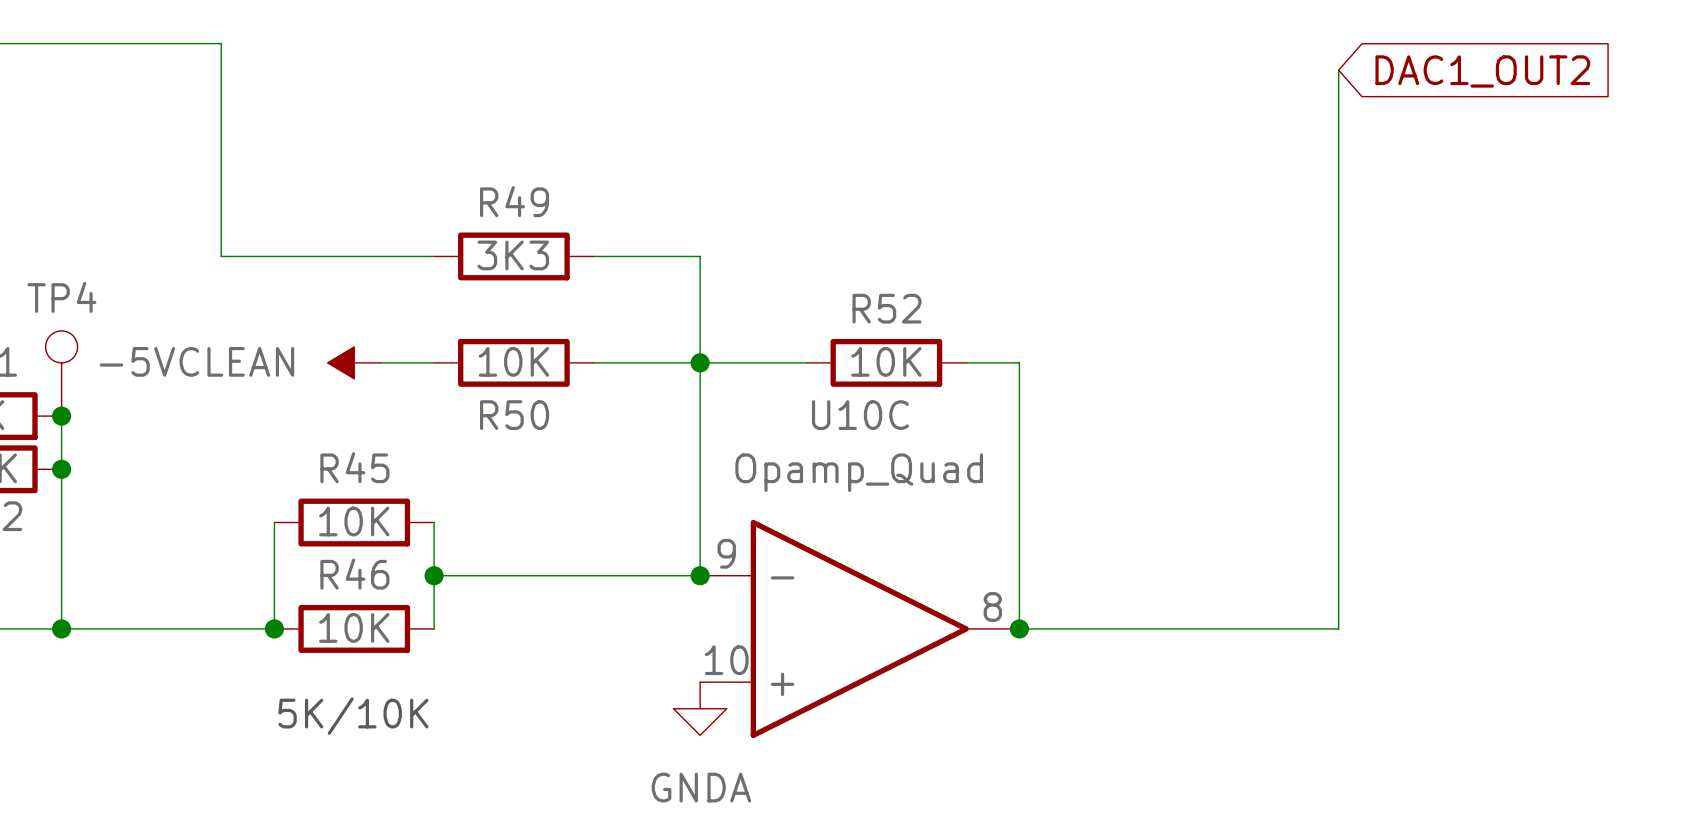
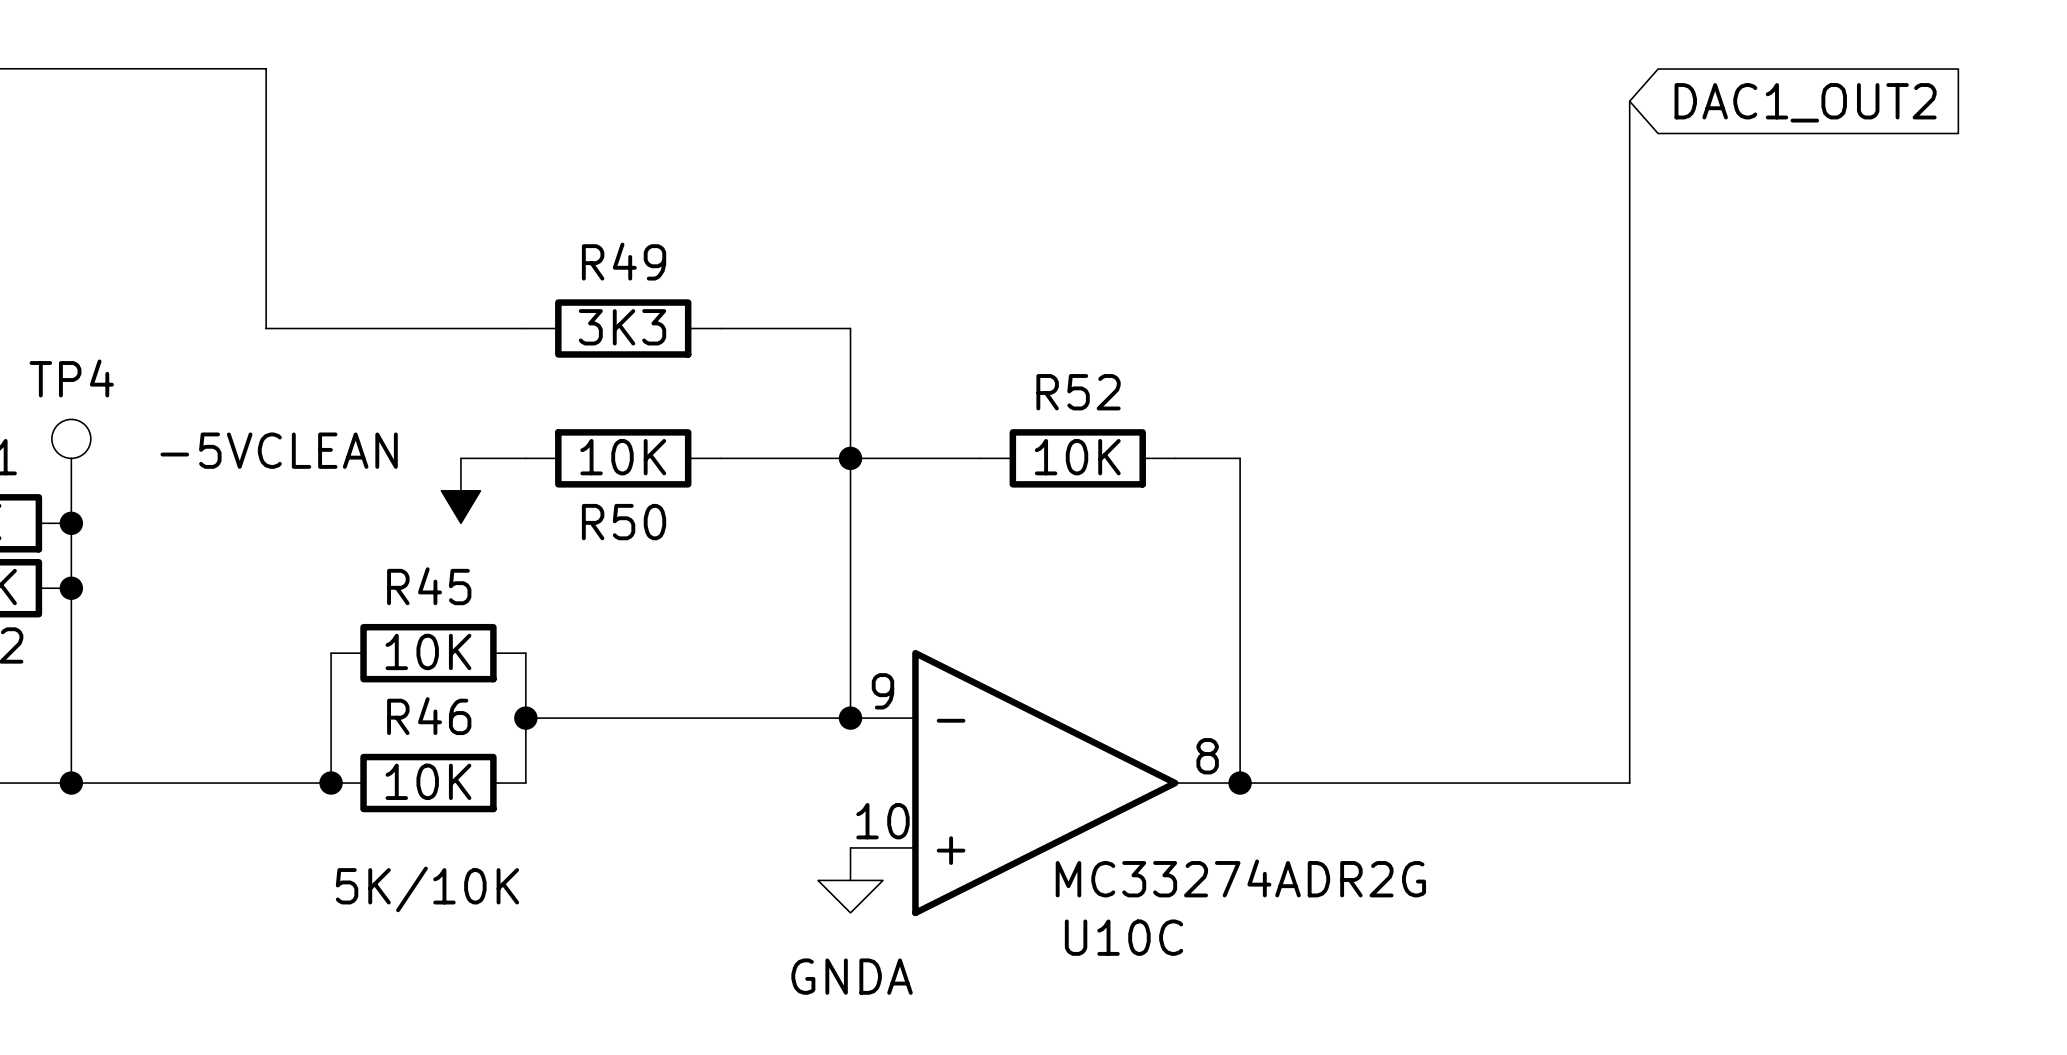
power symbol rotation: 0° (354, 362) -> 90° counterclockwise (460, 490)
power symbol position: -5VCLEAN (354, 362) -> -5VCLEAN (460, 490)
U10C name position: U10C (860, 415) -> U10C (1123, 937)
U10C value: Opamp_Quad (859, 472) -> MC33274ADR2G (1240, 878)

